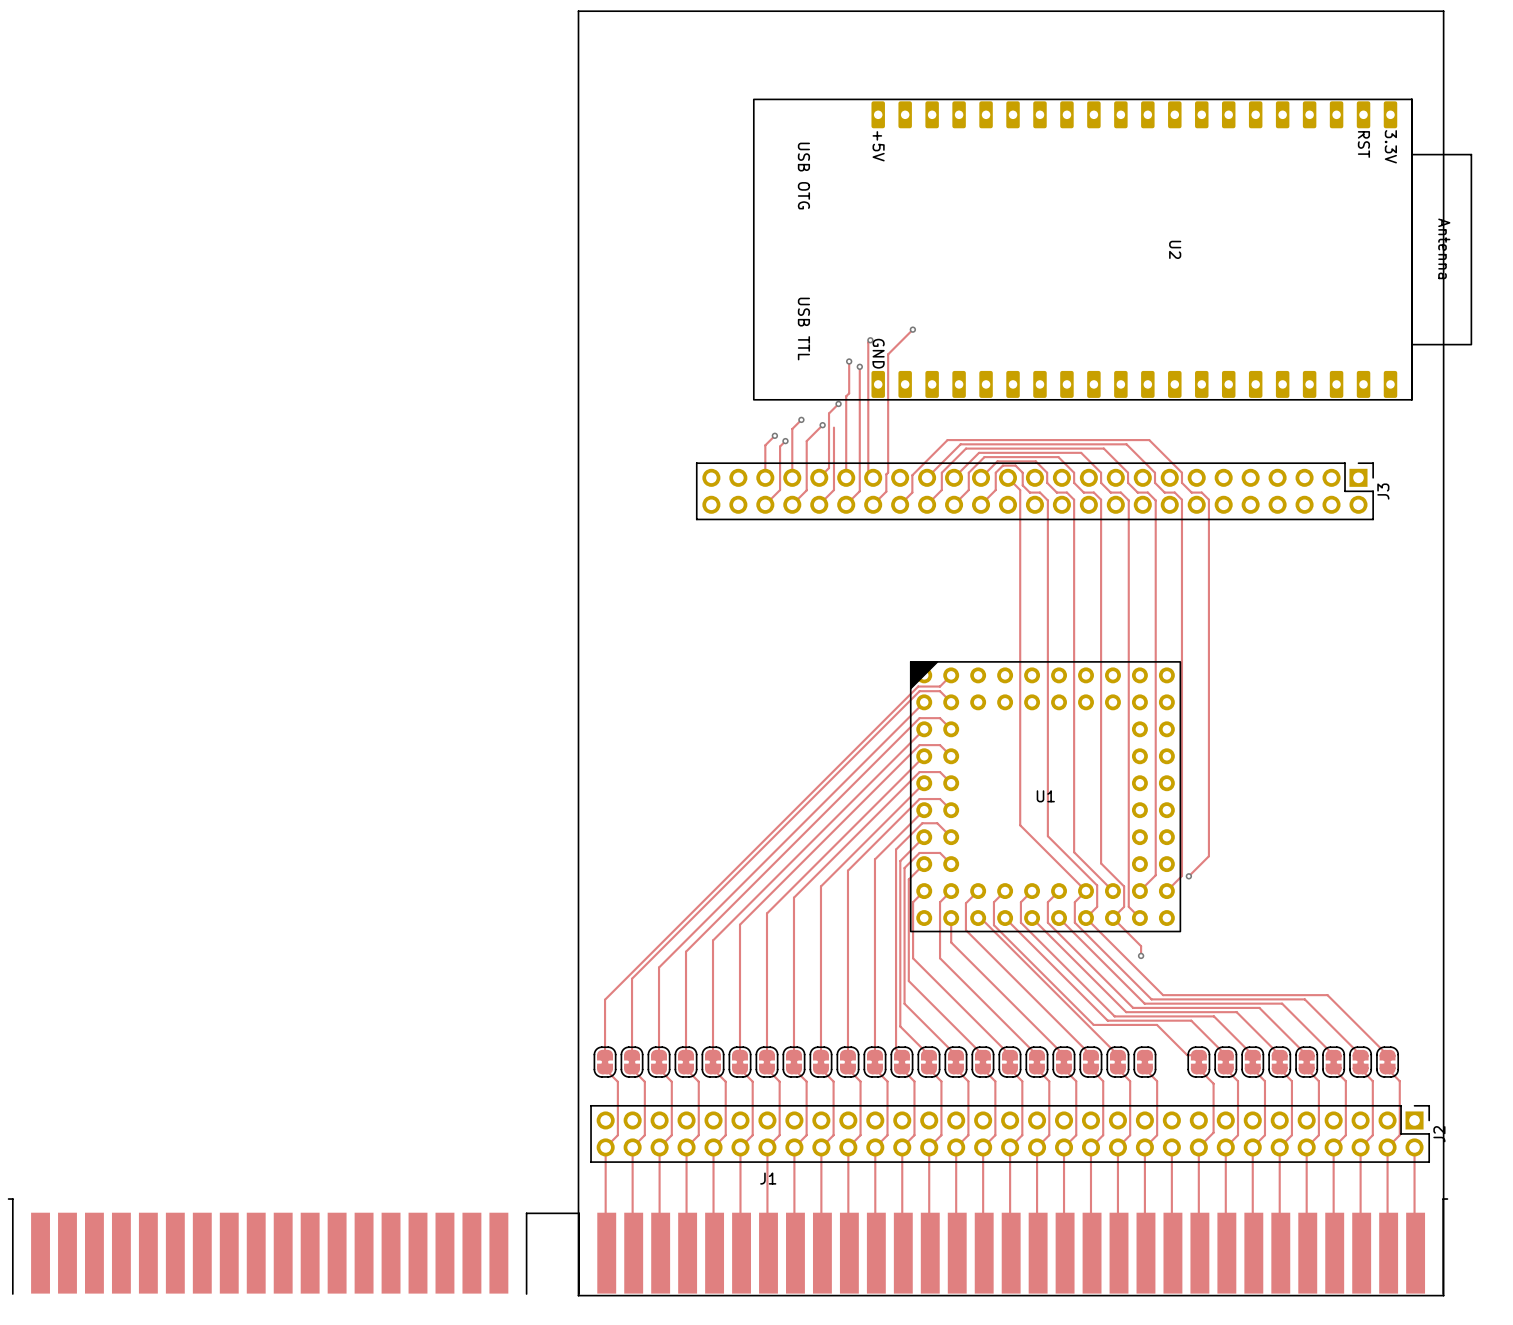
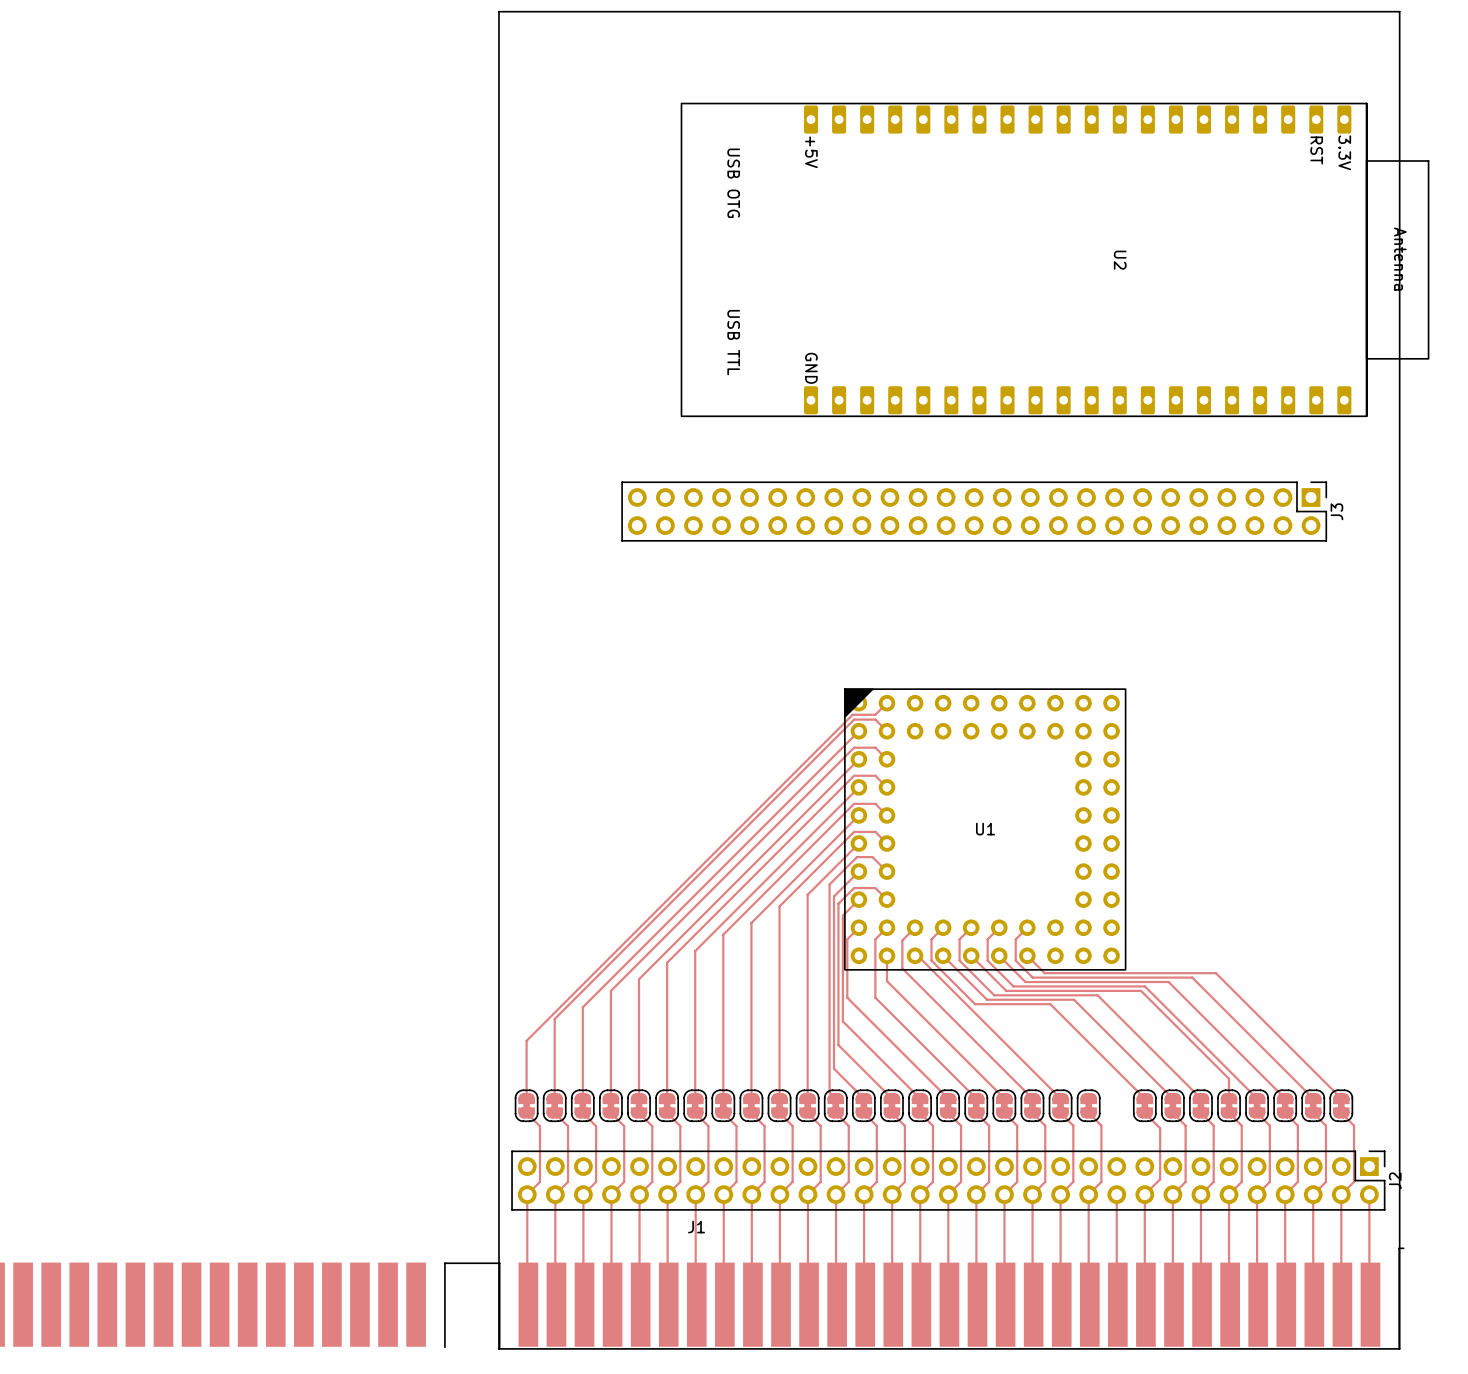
track: (912, 329) (888, 354) (888, 472) (886, 474) (886, 491) (873, 504) -> none
via: (912, 329) -> none
track: (870, 340) (868, 342) (868, 472) (873, 477) -> none
via: (870, 340) -> none
track: (849, 361) (849, 393) (846, 396) (846, 477) -> none
via: (849, 361) -> none
track: (859, 366) (859, 491) (846, 504) -> none
via: (859, 366) -> none
track: (838, 403) (829, 413) (829, 468) (819, 477) -> none
via: (838, 403) -> none
track: (801, 419) (792, 429) (792, 477) -> none
via: (801, 419) -> none
track: (822, 425) (806, 441) (806, 490) (792, 504) -> none
via: (822, 425) -> none
track: (833, 427) (833, 490) (819, 504) -> none
track: (774, 435) (765, 445) (765, 477) -> none
via: (774, 435) -> none
track: (785, 441) (780, 446) (780, 490) (765, 504) -> none
via: (785, 441) -> none
track: (927, 477) (960, 444) (1126, 444) (1155, 472) (1155, 482) (1164, 492) (1174, 492) (1181, 499) (1181, 875) (1166, 891) -> none
track: (954, 477) (979, 452) (1081, 452) (1101, 472) (1101, 482) (1110, 492) (1120, 492) (1128, 500) (1128, 906) (1139, 918) -> none
track: (981, 477) (997, 461) (1035, 461) (1047, 472) (1047, 482) (1056, 492) (1066, 492) (1074, 499) (1074, 852) (1112, 891) -> none
track: (1007, 477) (1020, 490) (1020, 825) (1086, 891) -> none
track: (900, 504) (912, 492) (912, 475) (947, 440) (1149, 440) (1181, 472) (1181, 482) (1191, 492) (1201, 492) (1208, 499) (1208, 856) (1188, 876) -> none
track: (927, 504) (941, 490) (941, 472) (966, 448) (1103, 448) (1128, 472) (1128, 482) (1137, 492) (1147, 492) (1155, 500) (1155, 875) (1139, 891) -> none
track: (954, 504) (968, 490) (968, 472) (984, 457) (1058, 457) (1074, 472) (1074, 482) (1083, 492) (1093, 492) (1101, 499) (1101, 863) (1124, 886) (1124, 906) (1112, 918) (1141, 946) (1141, 955) -> none
track: (981, 504) (995, 490) (995, 472) (1002, 465) (1015, 465) (1022, 472) (1022, 485) (1029, 492) (1040, 492) (1047, 500) (1047, 836) (1097, 885) (1097, 906) (1086, 918) -> none
via: (1188, 876) -> none
track: (993, 922) (993, 925) (1093, 1024) (1157, 1024) (1187, 1055) (1198, 1055) -> (931, 960) (975, 1004) (1050, 1004) (1144, 1098)
track: (1102, 934) (1163, 995) (1327, 995) -> (1044, 973) (1215, 973) (1278, 1036)
track: (1091, 938) (1151, 999) (1304, 999) -> (1032, 977) (1192, 977) (1255, 1040)
track: (1084, 943) (1144, 1003) (1282, 1003) -> (1025, 982) (1168, 982) (1231, 1044)
track: (1072, 947) (1133, 1007) (1259, 1007) -> (1013, 986) (1144, 986) (1207, 1049)
track: (1065, 951) (1126, 1012) (1236, 1012) (1279, 1055) -> (1006, 990) (1141, 990) (1229, 1078) (1229, 1098)
track: (1054, 955) (1114, 1016) (1213, 1016) -> (994, 995) (1097, 995) (1160, 1058)
via: (1141, 955) -> none
track: (1047, 960) (1107, 1020) (1191, 1020) -> (987, 999) (1074, 999) (1136, 1062)

